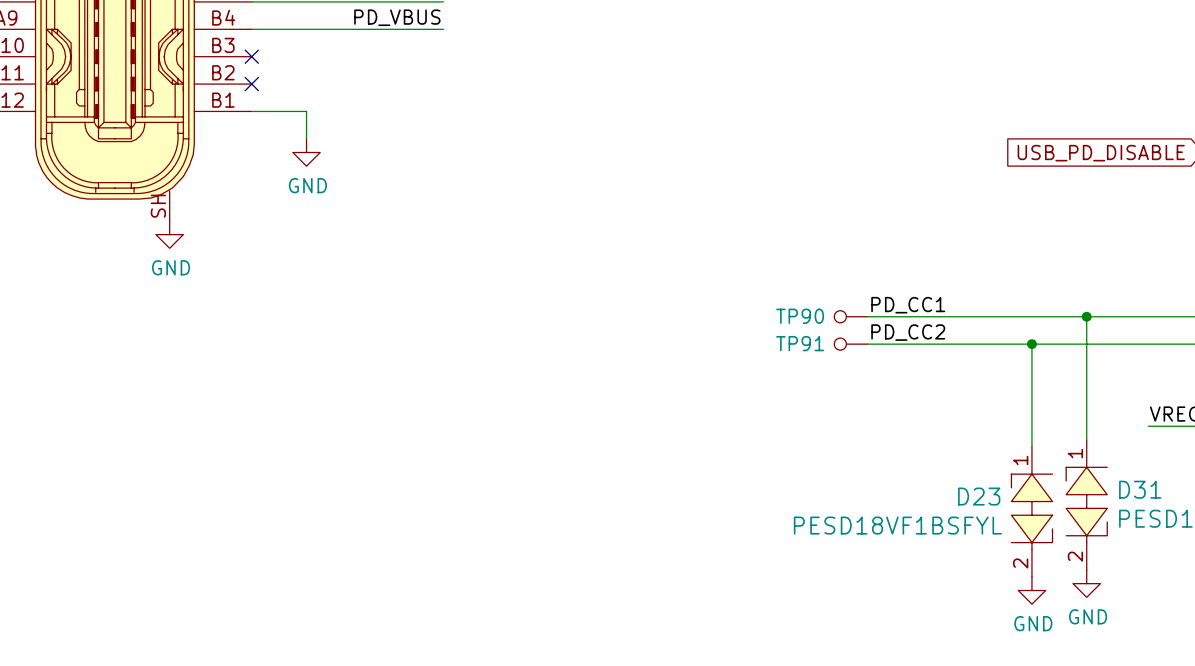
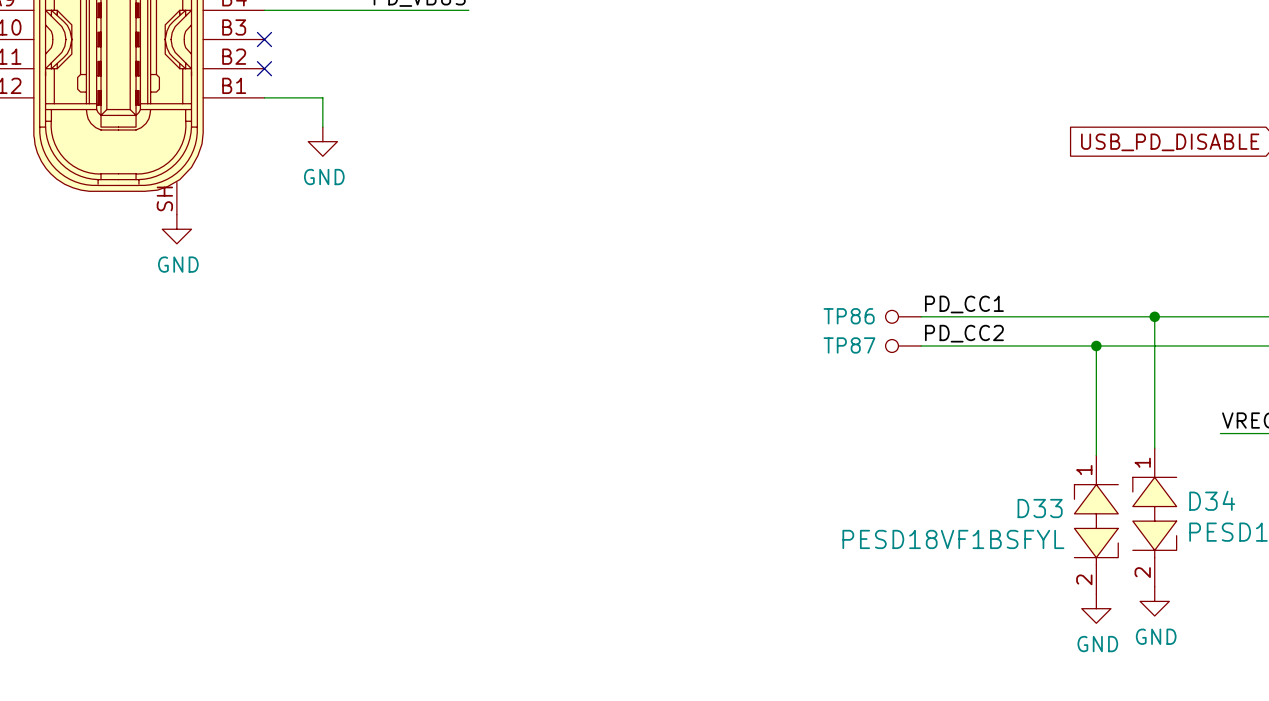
TP90 name: TP90 (800, 316) -> TP86 (849, 316)
TP91 name: TP91 (800, 343) -> TP87 (849, 345)
D31 name: D31 (1140, 489) -> D34 (1212, 500)
D23 name: D23 (979, 496) -> D33 (1040, 508)

